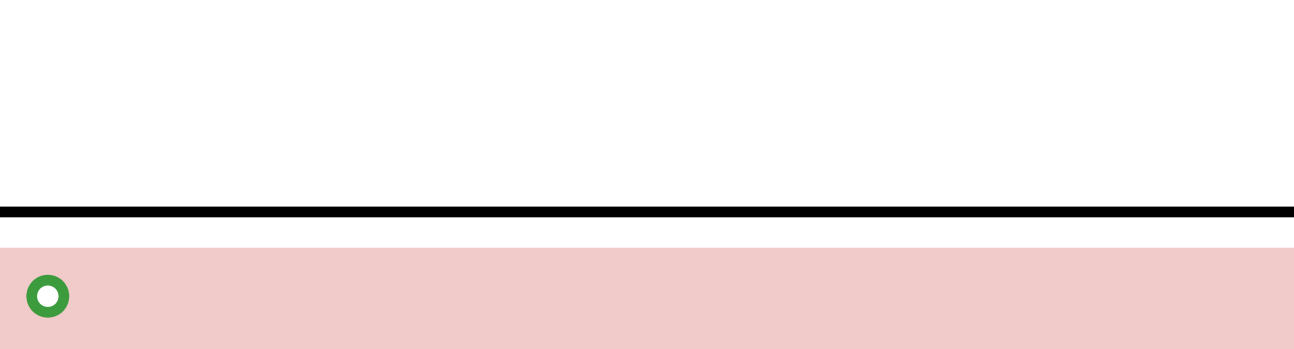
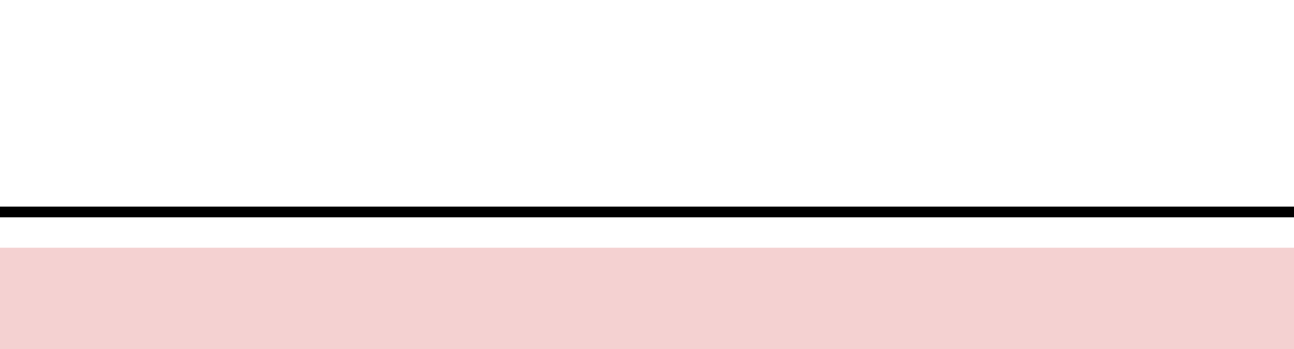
via: (47, 296) -> none

